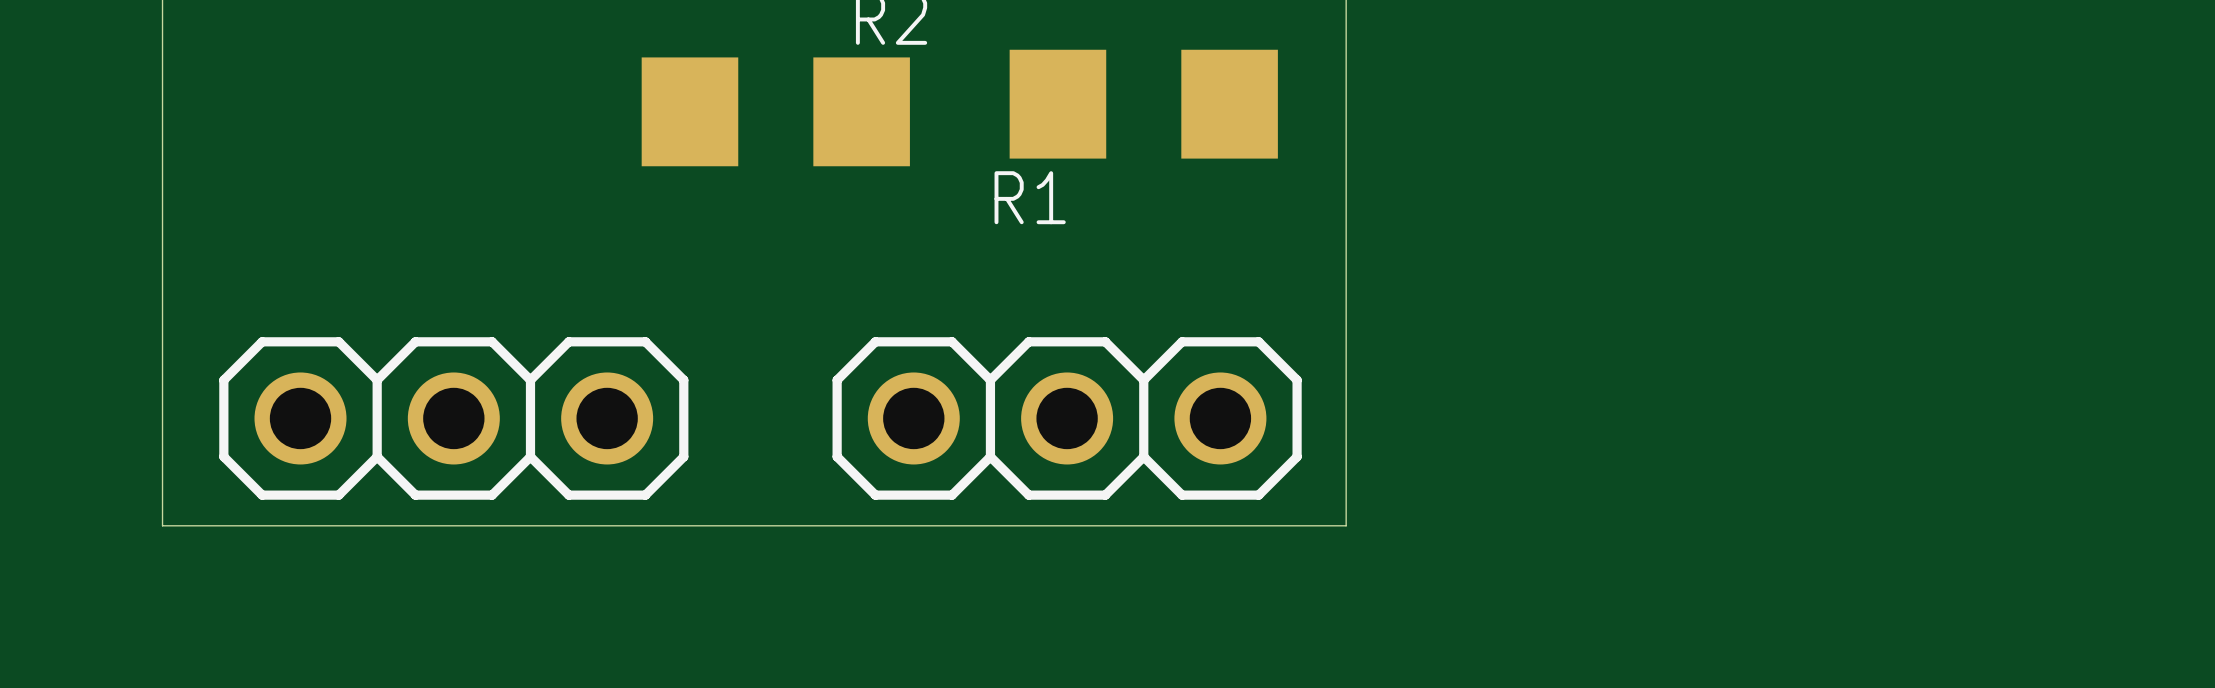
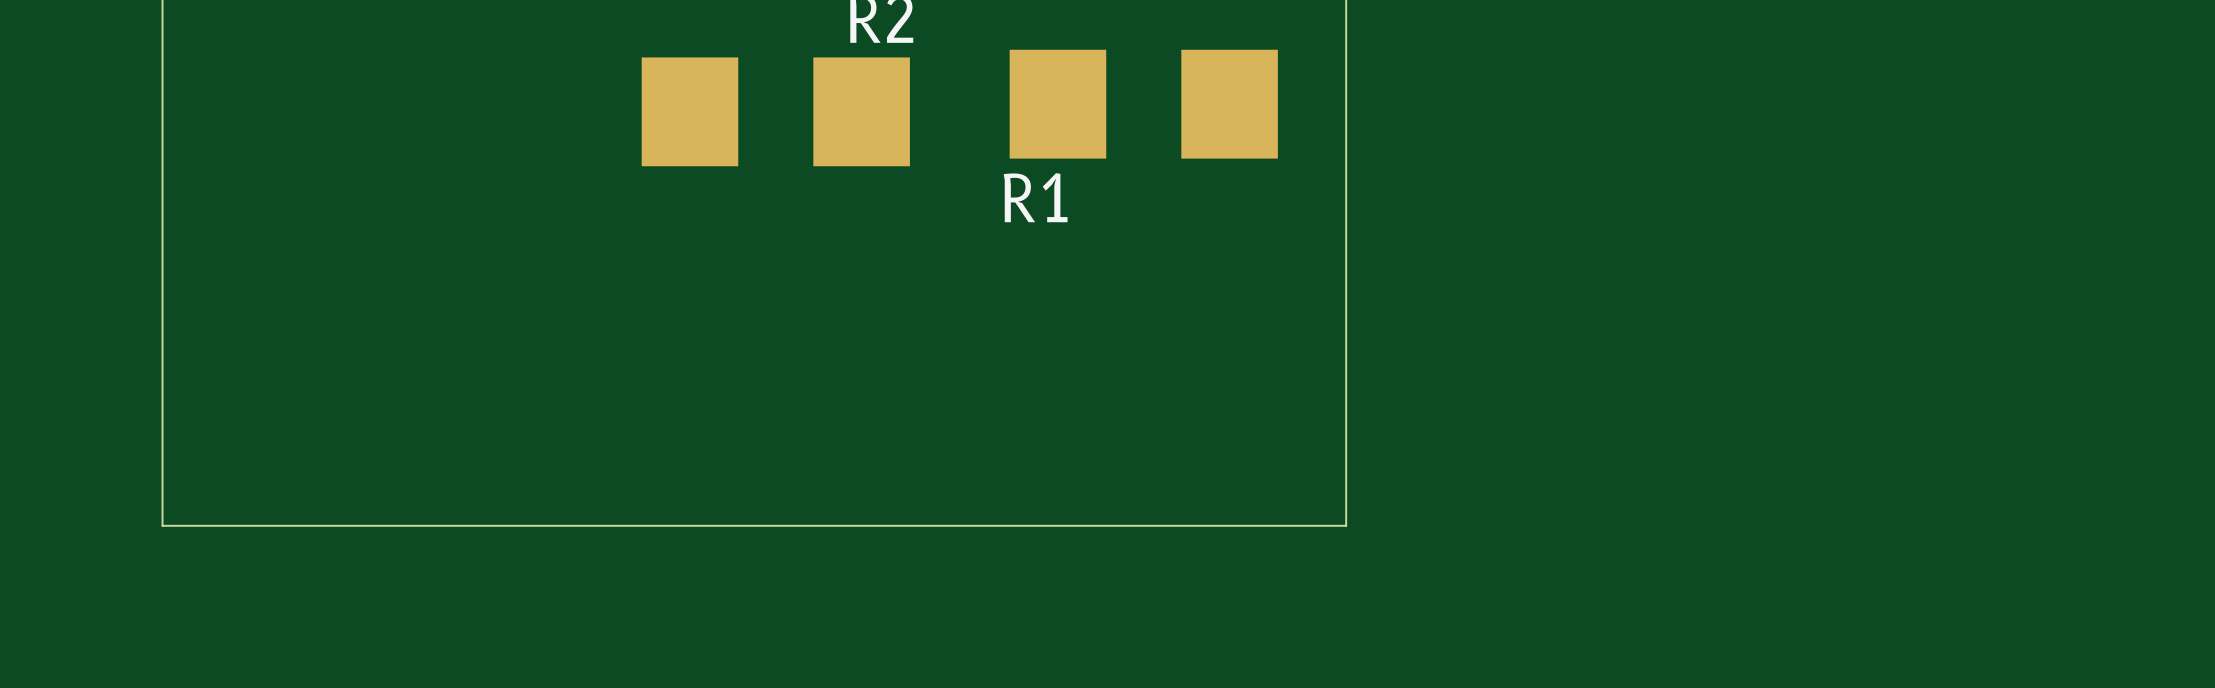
part: (453, 418) -> none
part: (1067, 418) -> none

